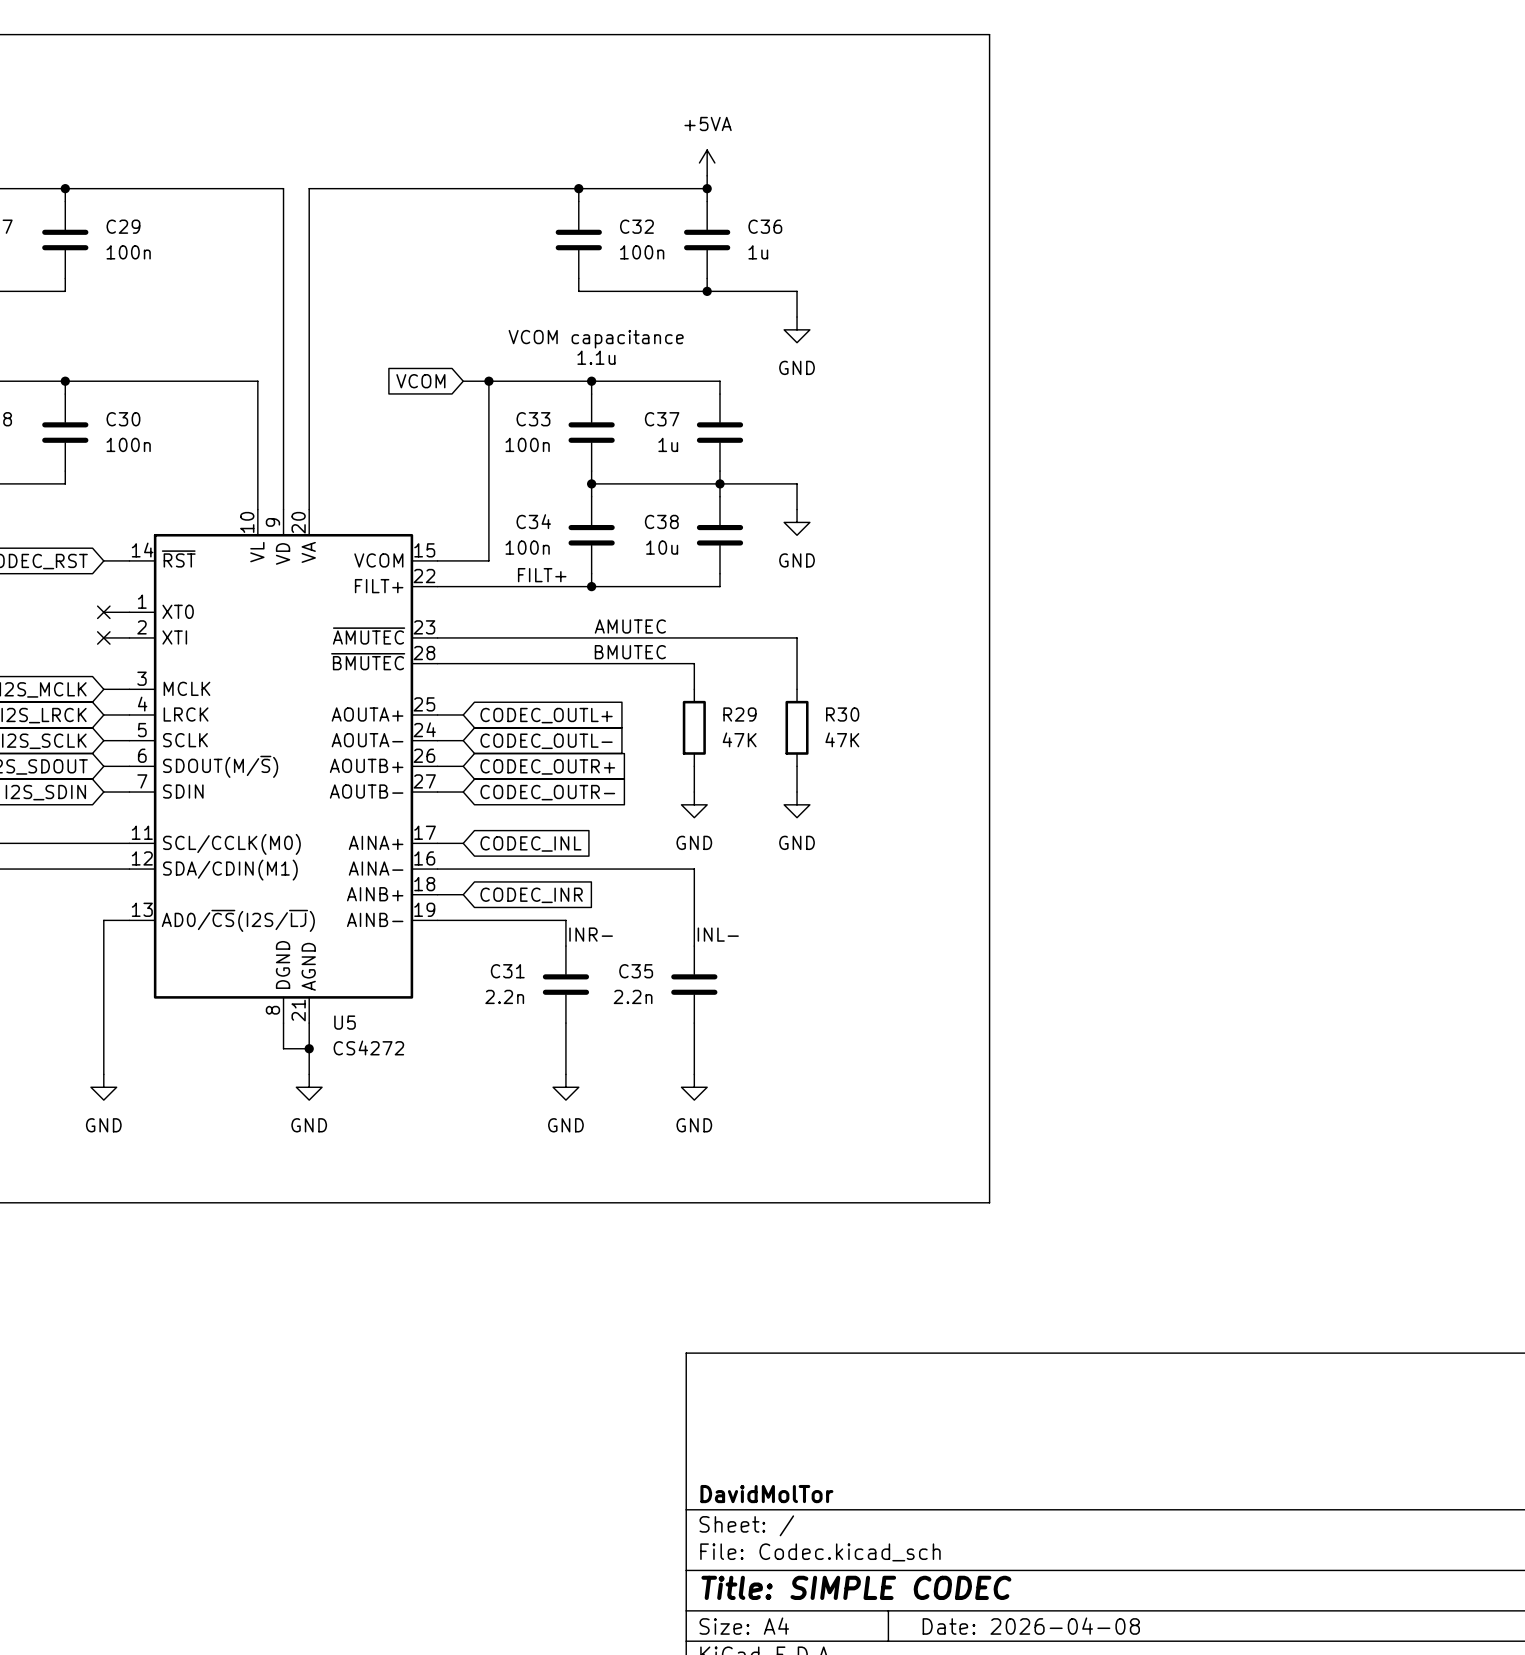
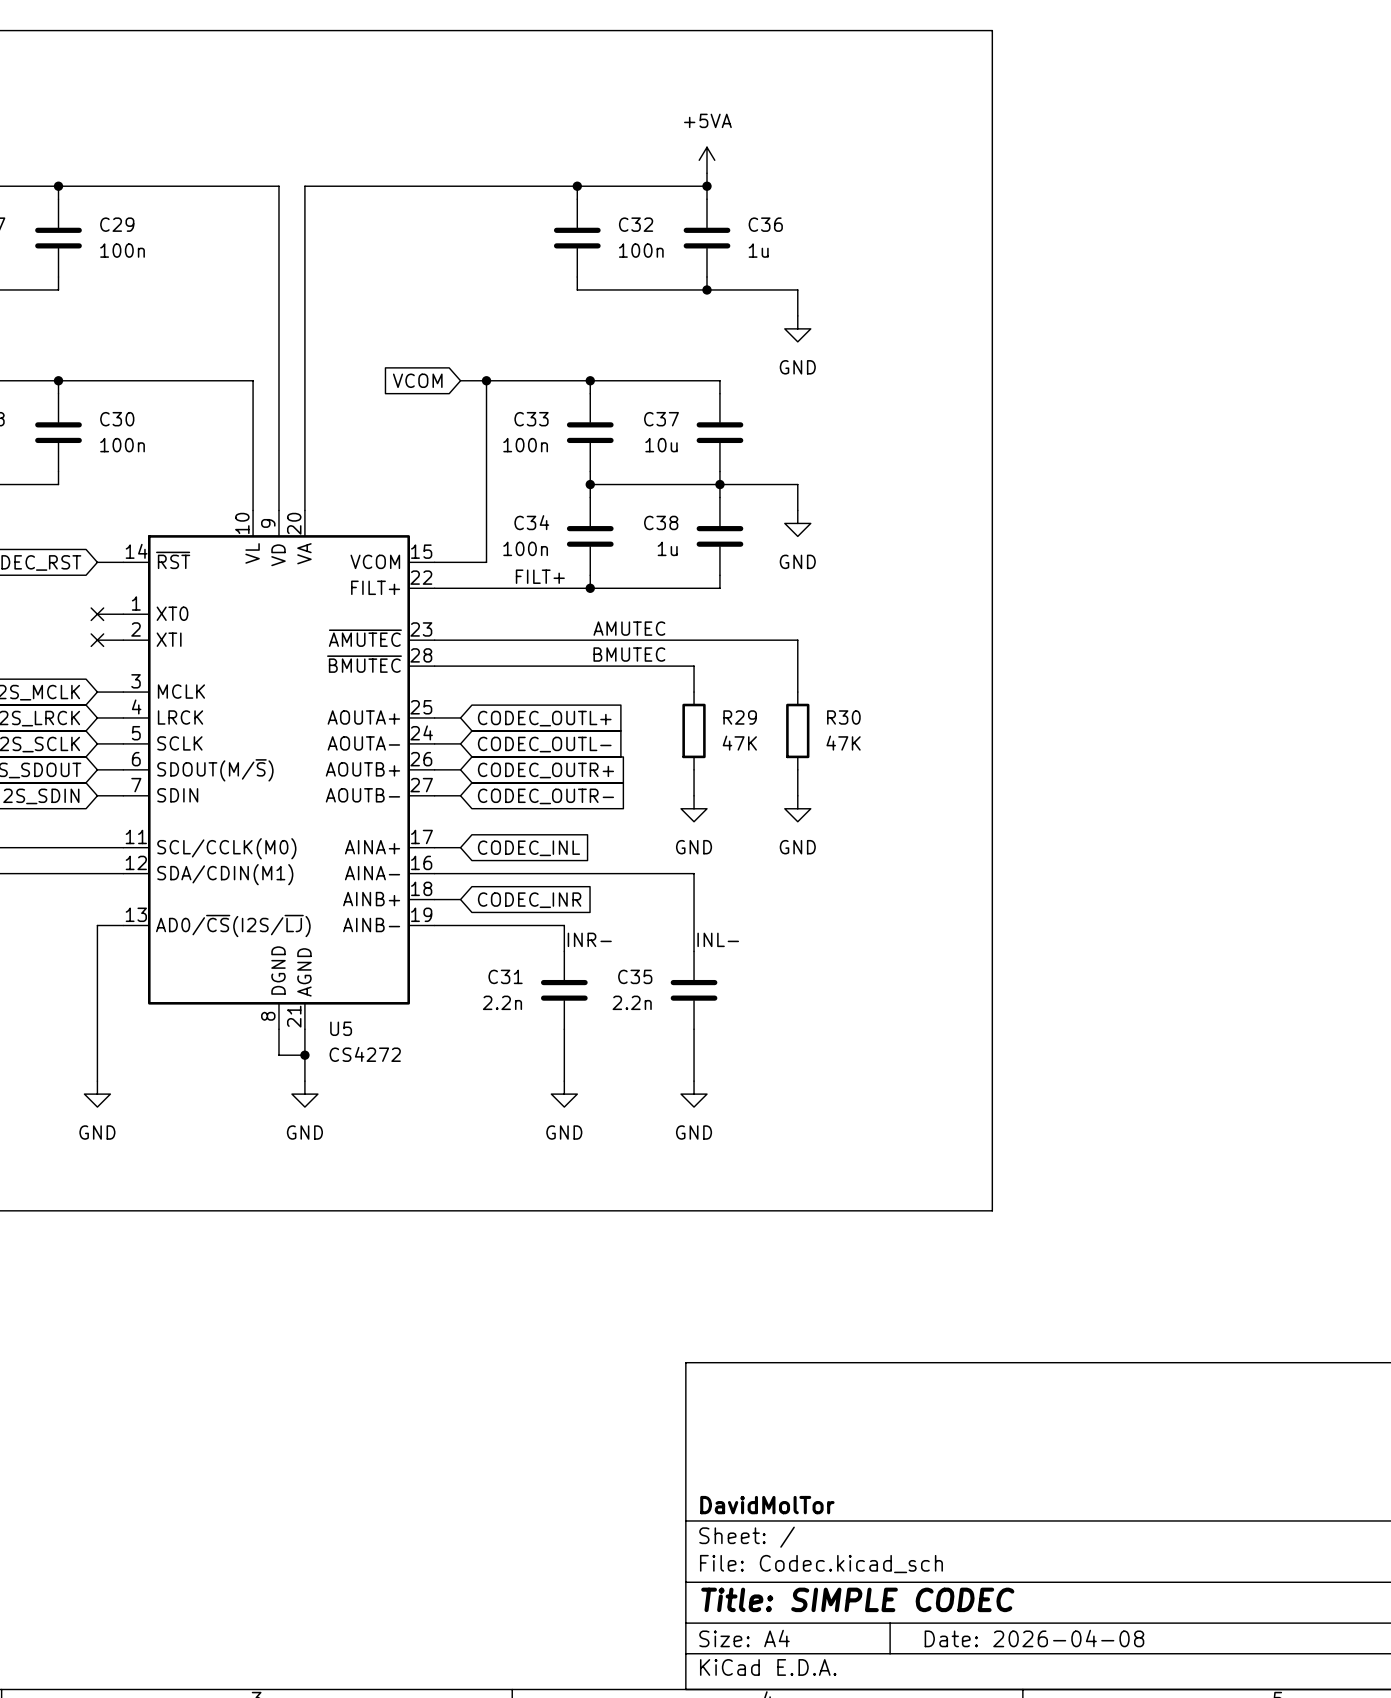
text: VCOM capacitance (596, 339) -> none
text: 1.1u (596, 357) -> none
C37 value: 1u (668, 444) -> 10u (661, 445)
C38 value: 10u (662, 547) -> 1u (667, 548)

